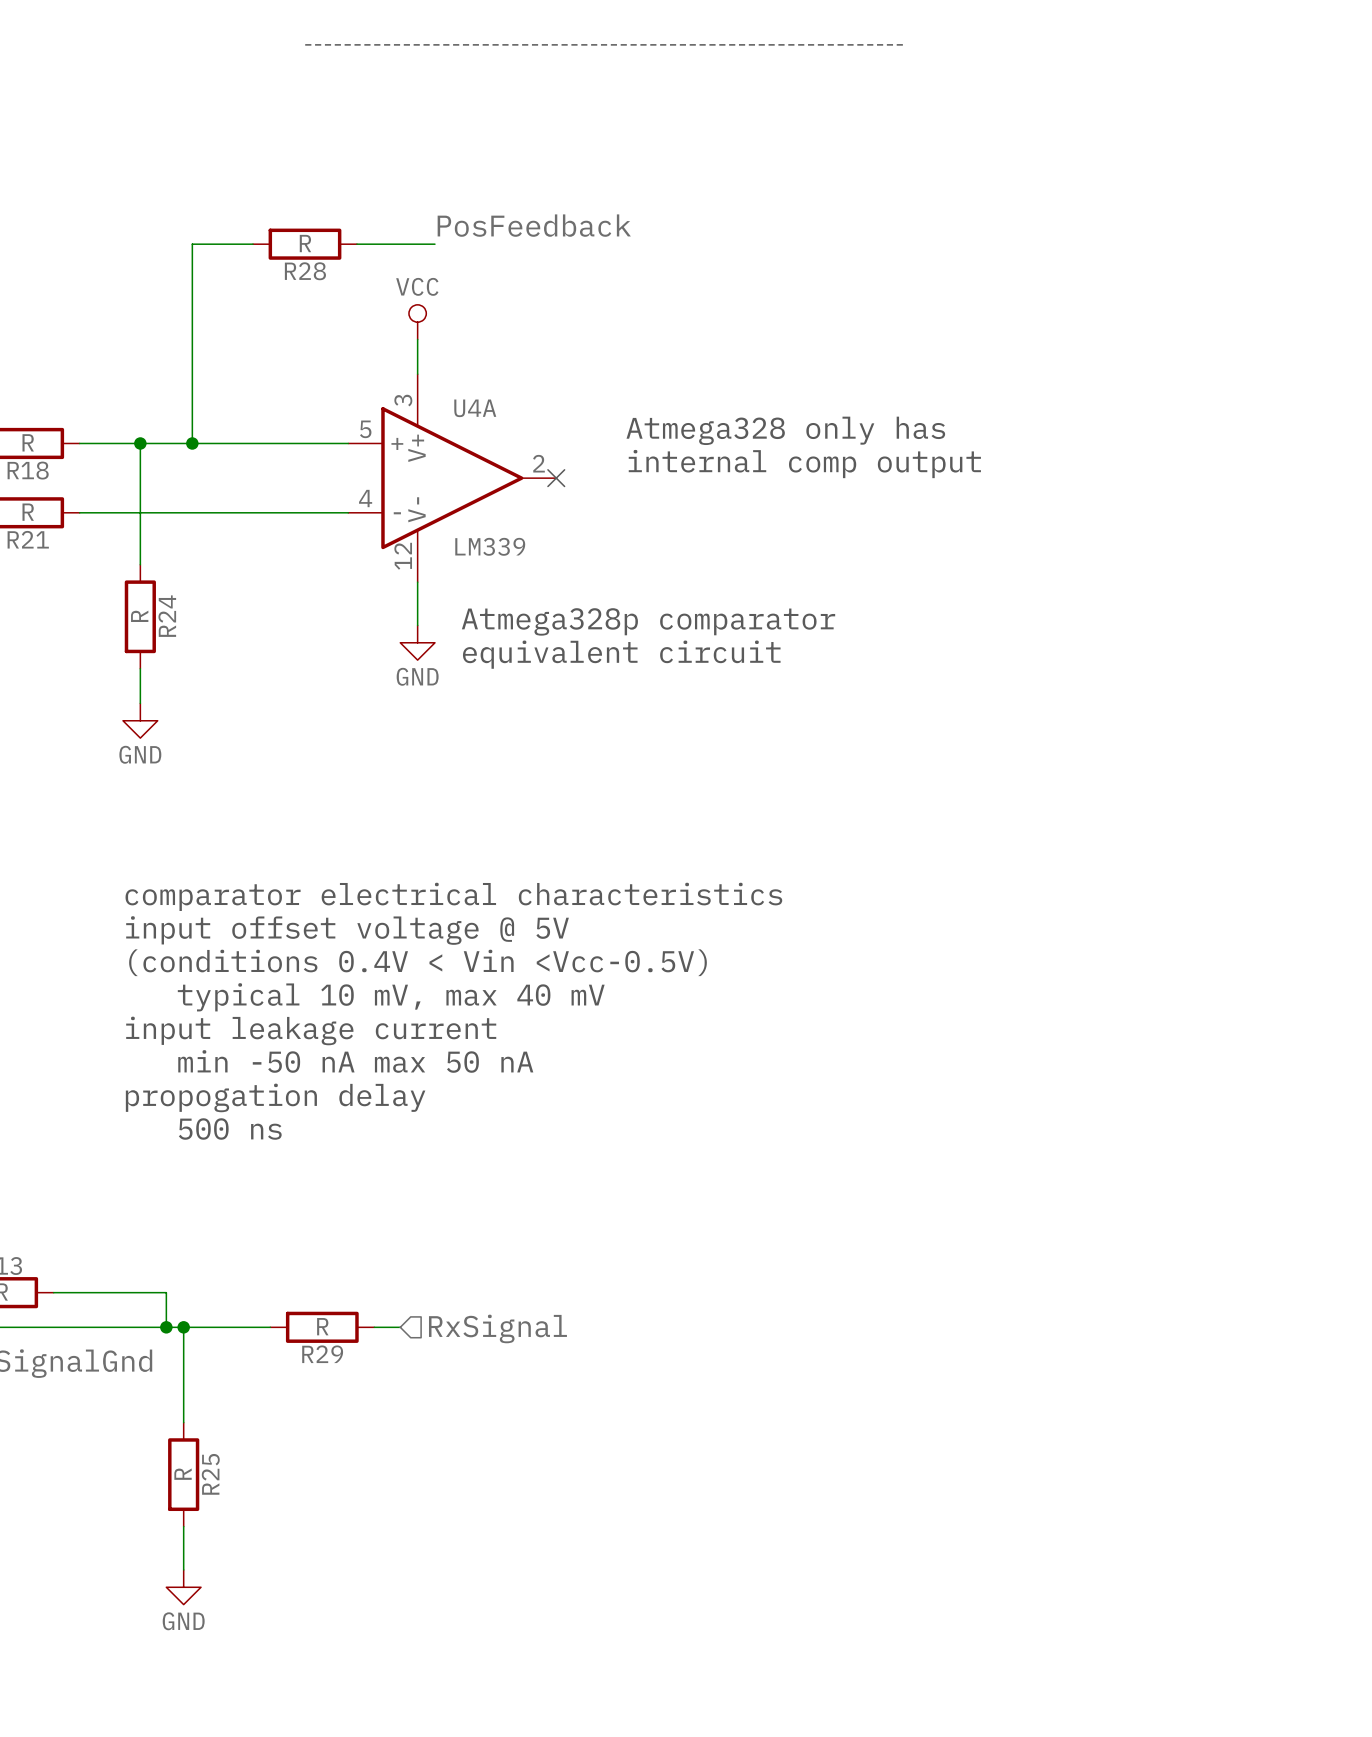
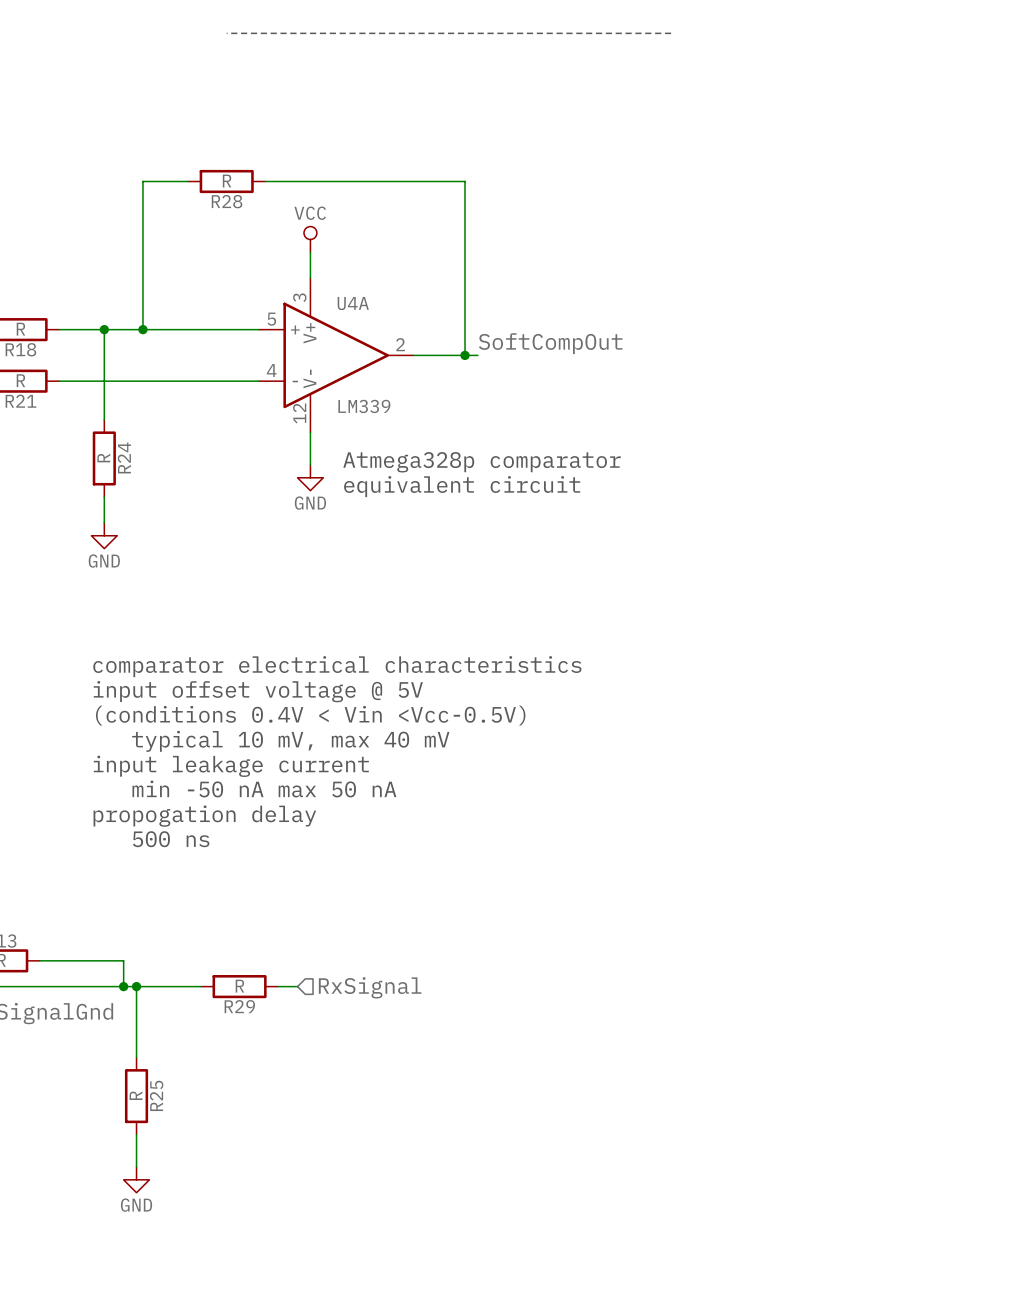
label: PosFeedback (534, 225) -> none
wire: none -> (323, 181) (465, 181) (465, 355)
text: Atmega328 only has (785, 430) -> none
label: none -> SoftCompOut (550, 343)
text: internal comp output (804, 464) -> none
wire: none -> (413, 355) (477, 355)
no-connect mark: (556, 478) -> none
junction: none -> (465, 355)

